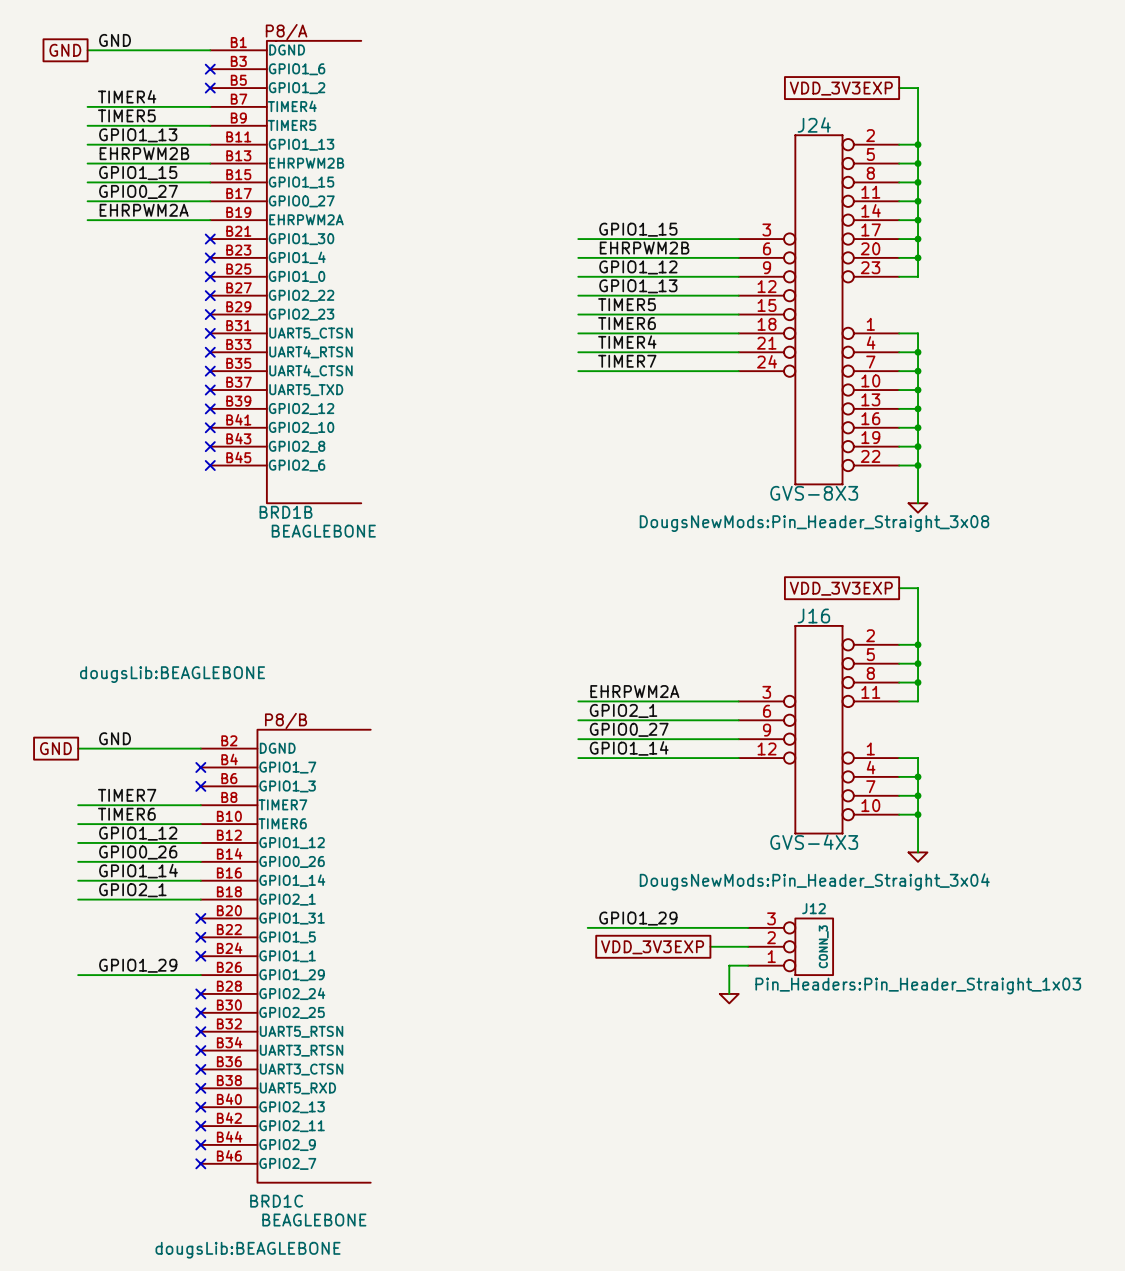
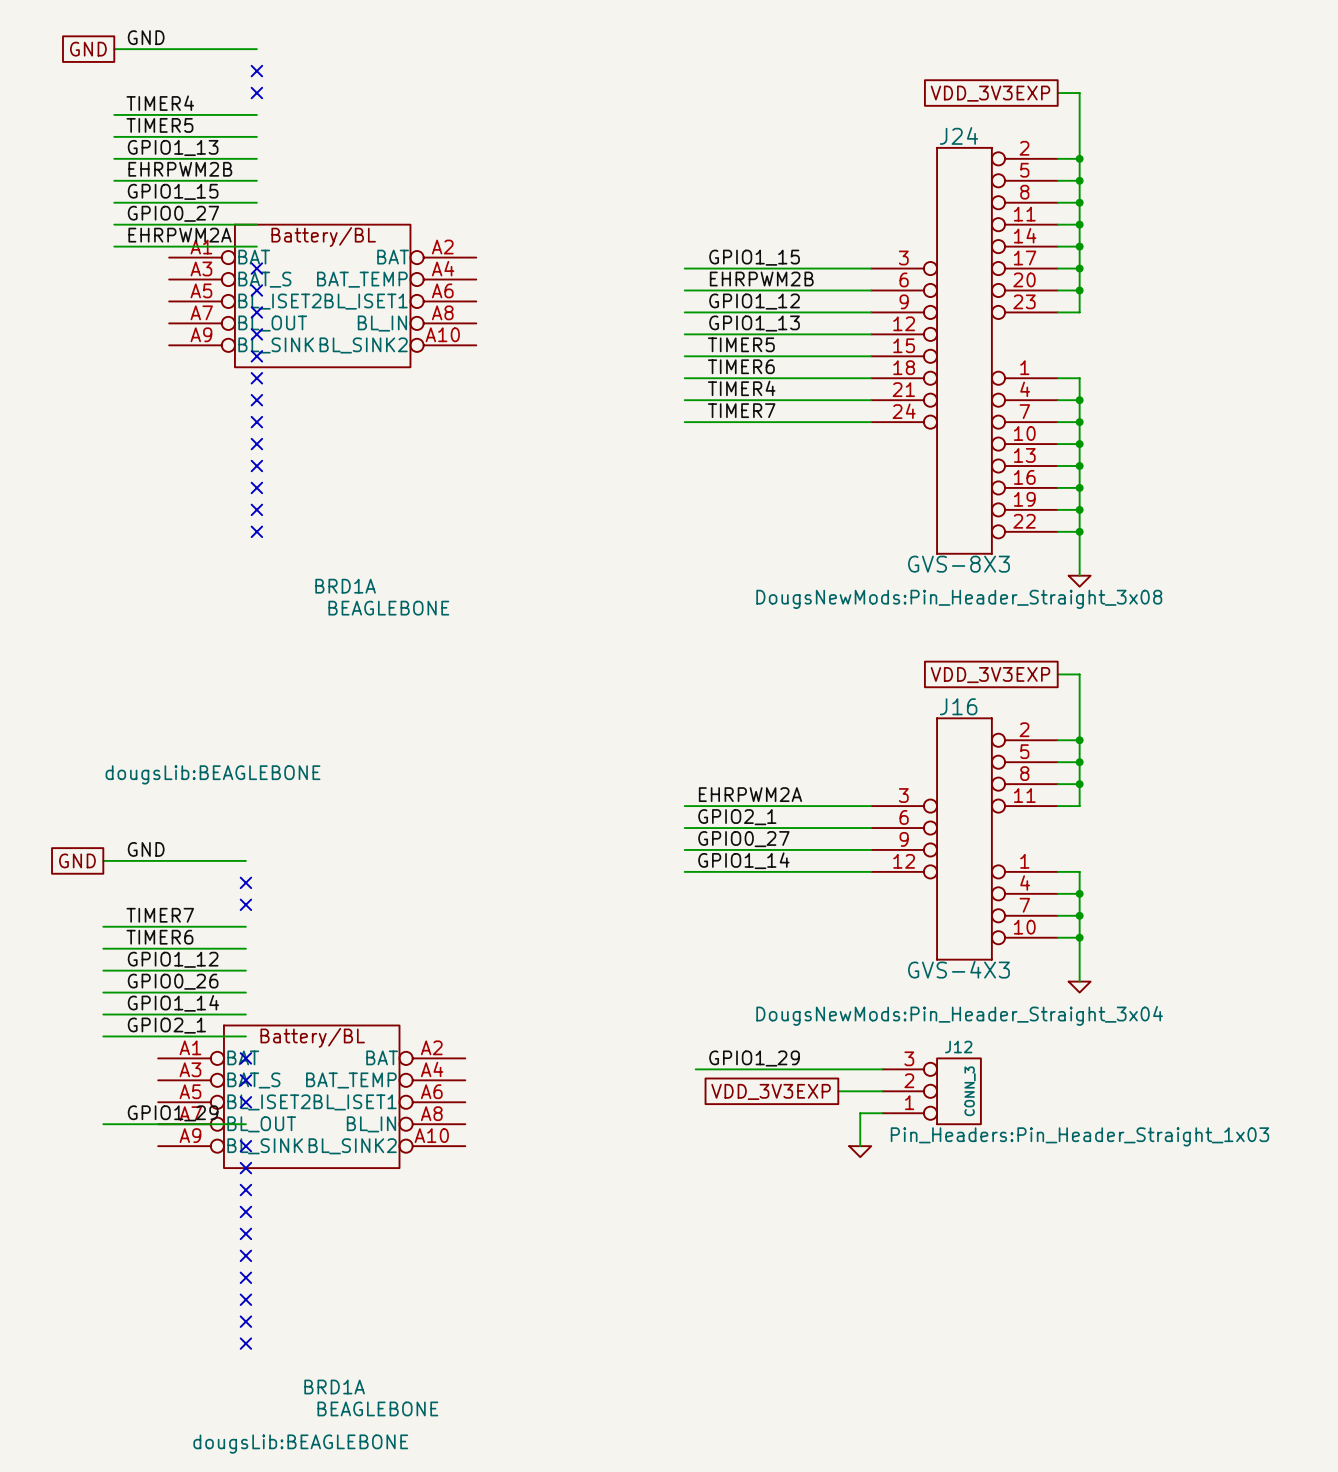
BRD1A: none -> BEAGLEBONE (322, 295)
BRD1B: BEAGLEBONE (285, 272) -> none
BRD1A: none -> BEAGLEBONE (311, 1096)
BRD1C: BEAGLEBONE (285, 956) -> none

